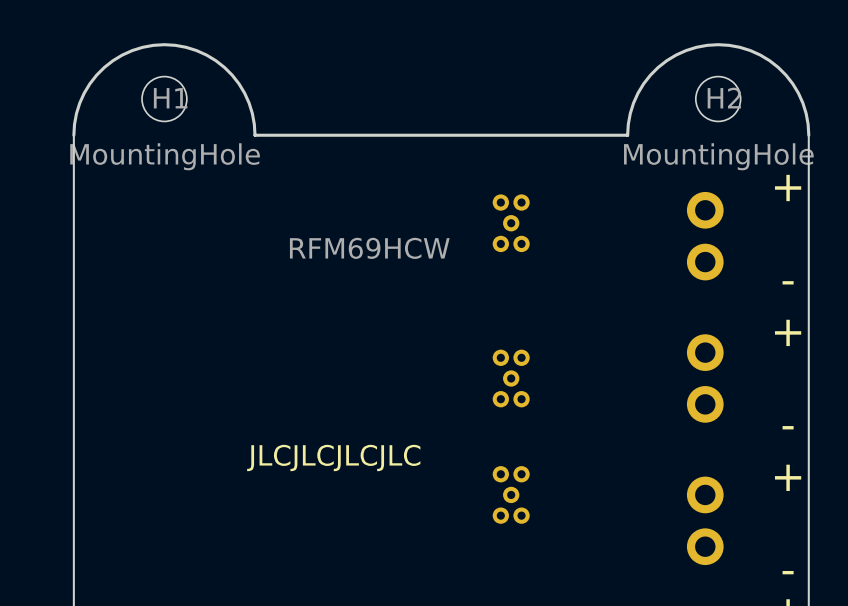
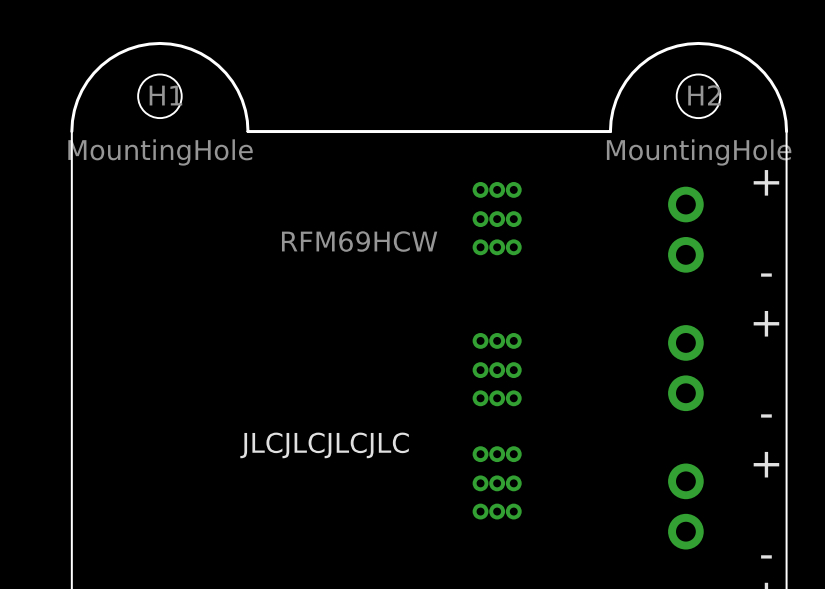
part footprint: [492, 194, 530, 253] -> [472, 181, 522, 256]
part footprint: [492, 349, 530, 408] -> [472, 332, 522, 407]
part footprint: [492, 466, 530, 524] -> [472, 446, 522, 520]

